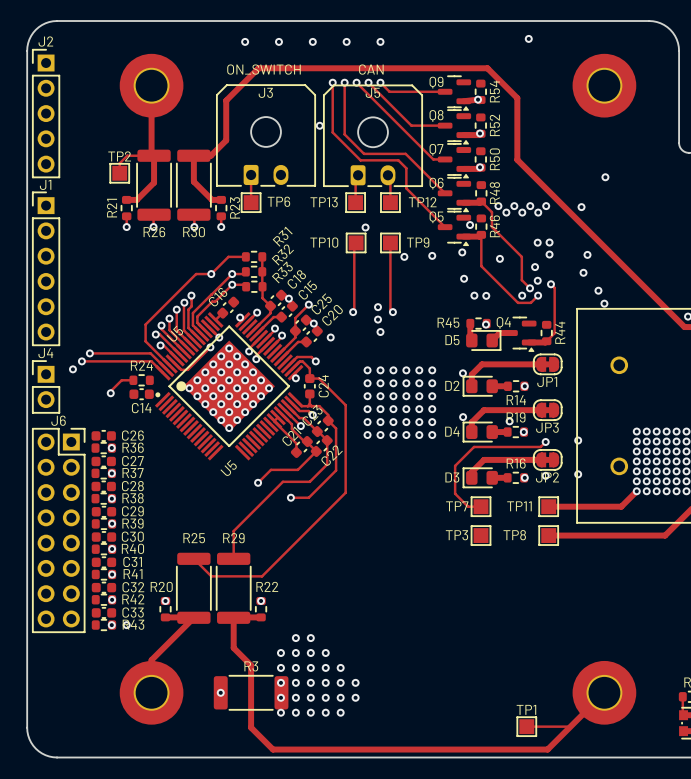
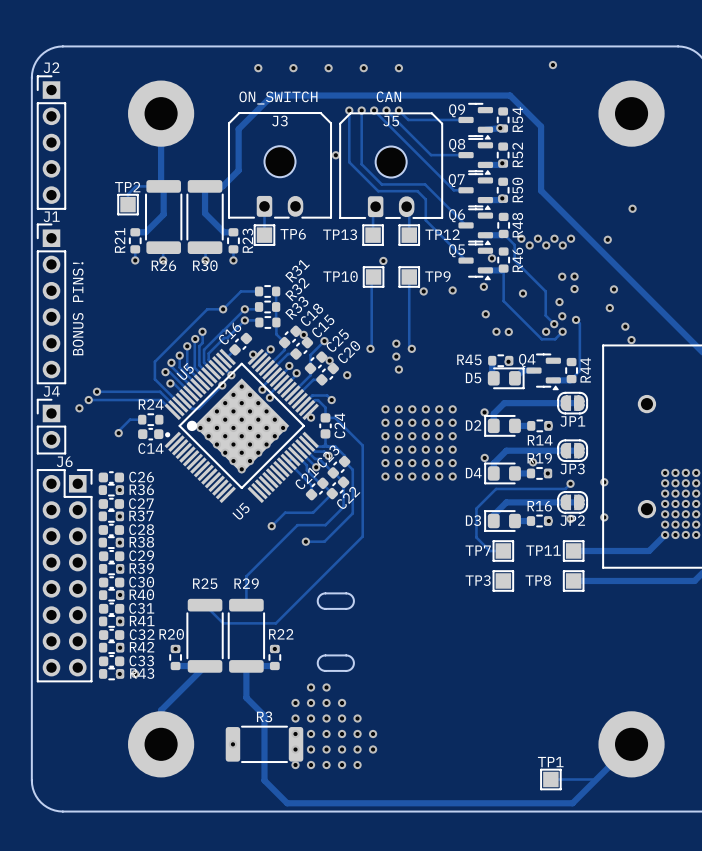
text: none -> BONUS PINS! (78, 308)
board edge: none -> (325, 593) (349, 593) (353, 598) (353, 604) (347, 608) (322, 608) (318, 604) (317, 599) (321, 594) (325, 593)
board edge: none -> (325, 655) (348, 655) (353, 659) (353, 665) (347, 670) (322, 670) (318, 667) (317, 662) (320, 657) (325, 655)

